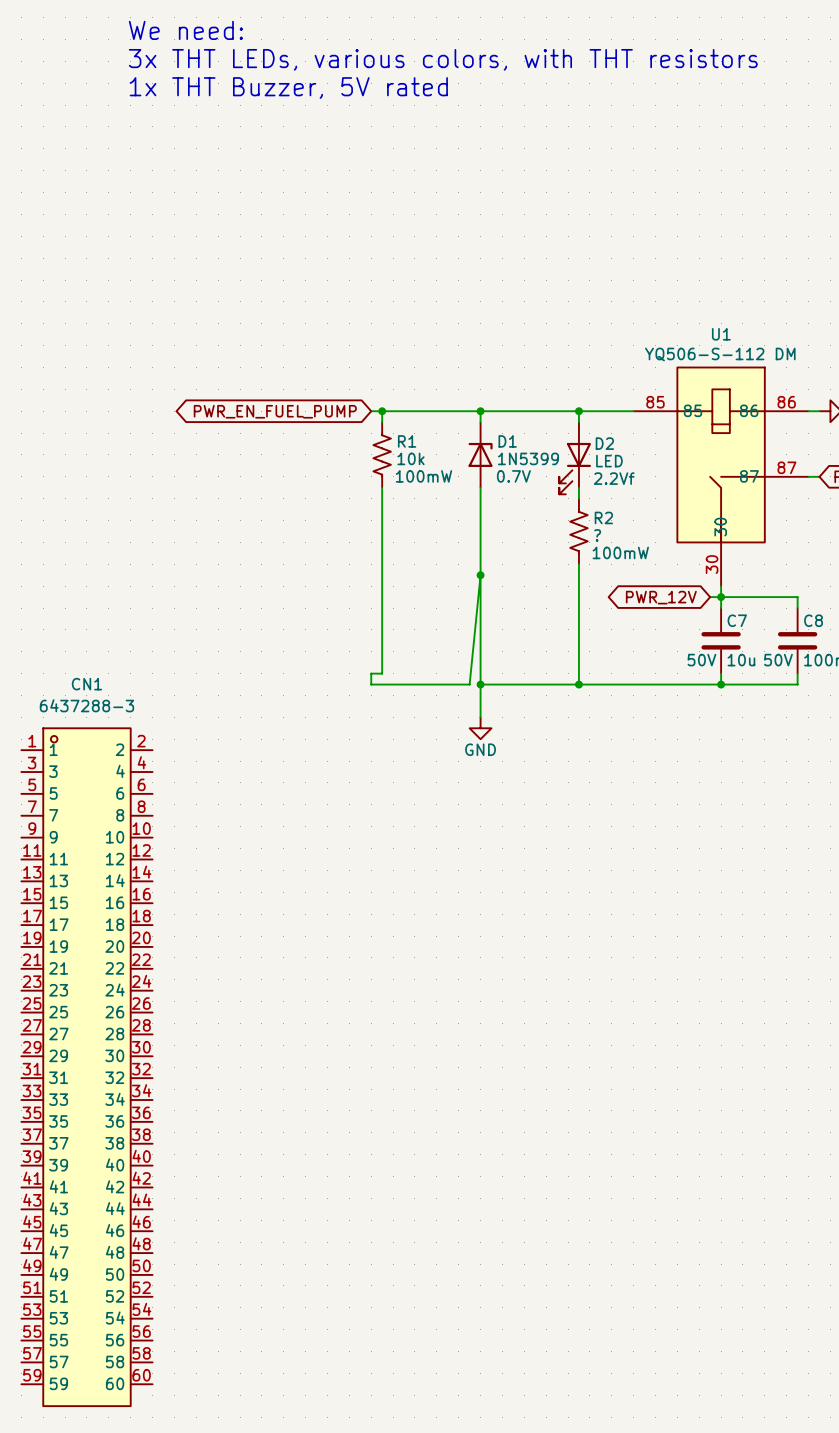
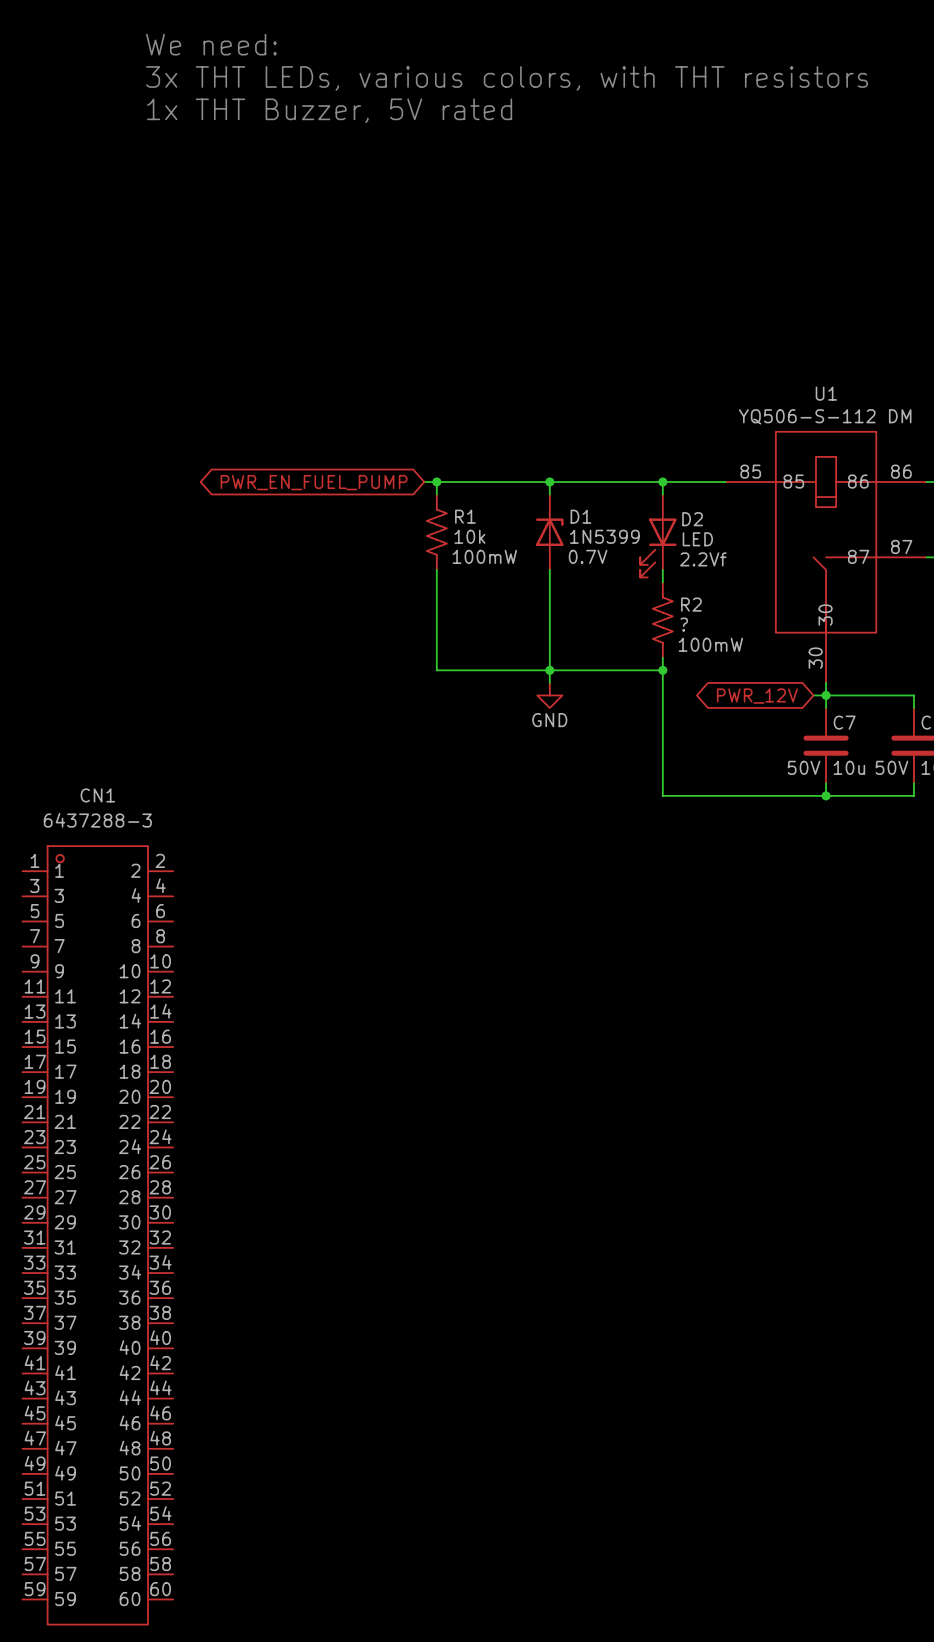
wire: (382, 575) (382, 673) (371, 673) (371, 684) (469, 684) (480, 575) -> (436, 670) (662, 670)
junction: none -> (662, 670)
wire: (480, 586) (480, 717) -> none
wire: (480, 684) (578, 684) -> none
junction: (480, 684) -> none
junction: (578, 684) -> none
power symbol position: GND (480, 728) -> GND (549, 695)

